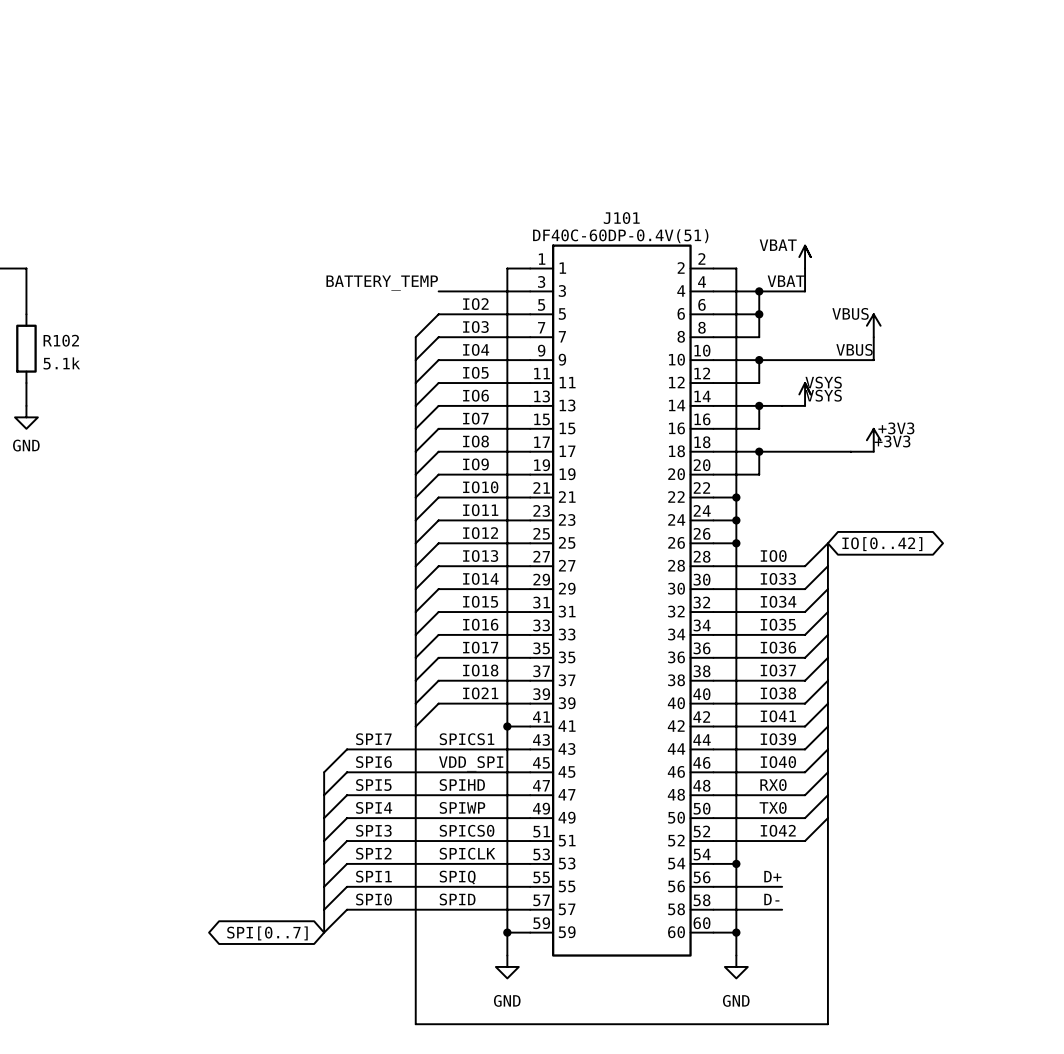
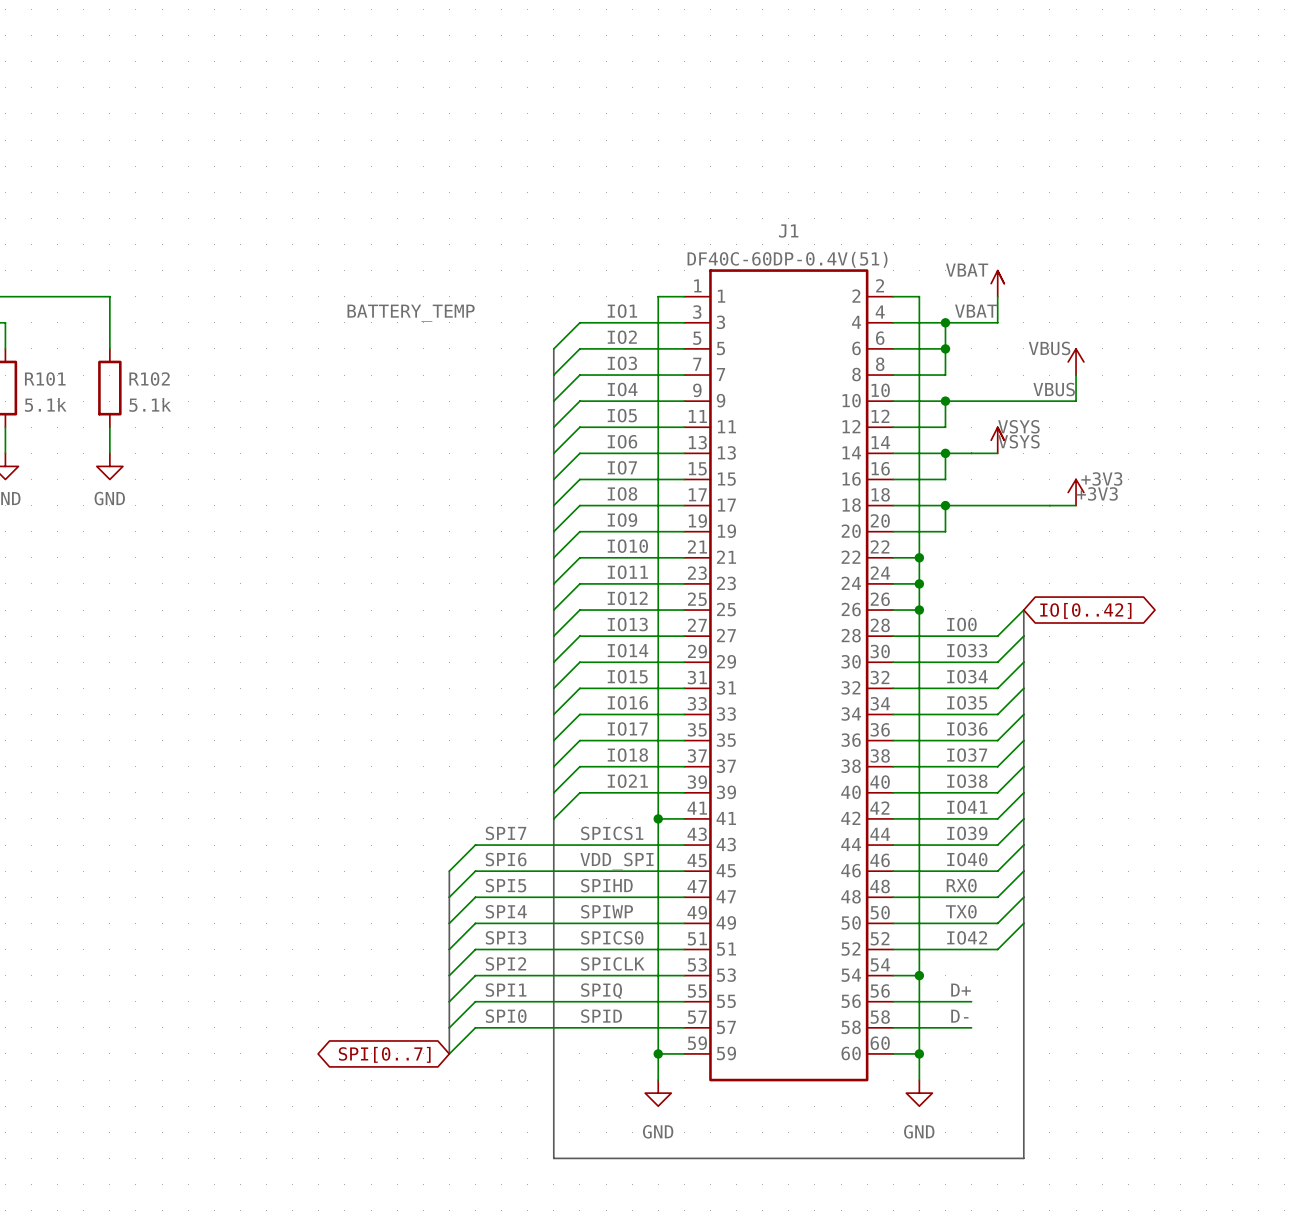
J101 name: J101 (621, 218) -> J1 (788, 231)
label: none -> IO1 (622, 311)
label position: BATTERY_TEMP (382, 283) -> BATTERY_TEMP (411, 313)
wire: none -> (579, 322) (553, 348)
bus: none -> (553, 348) (553, 375)

